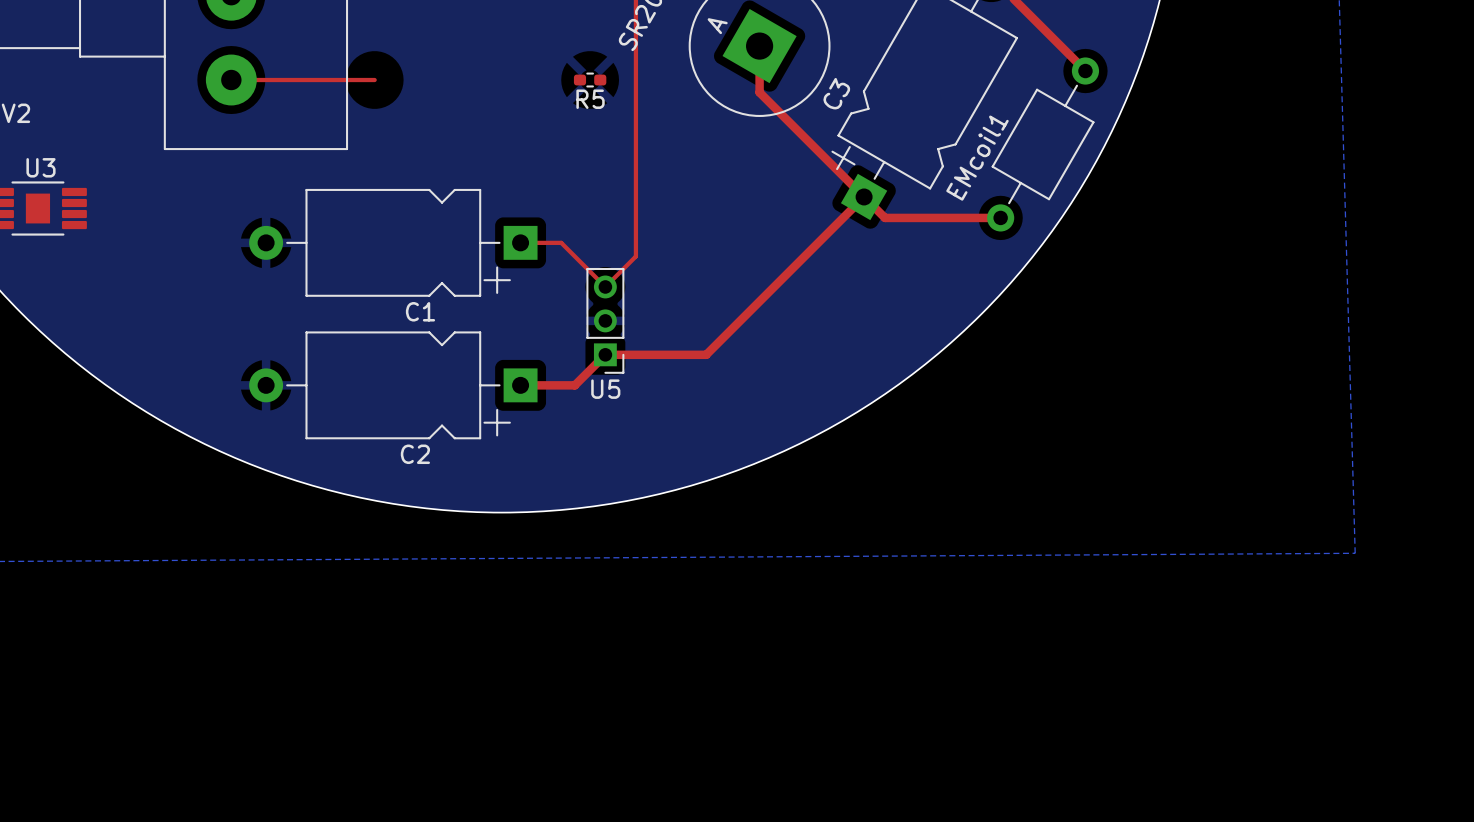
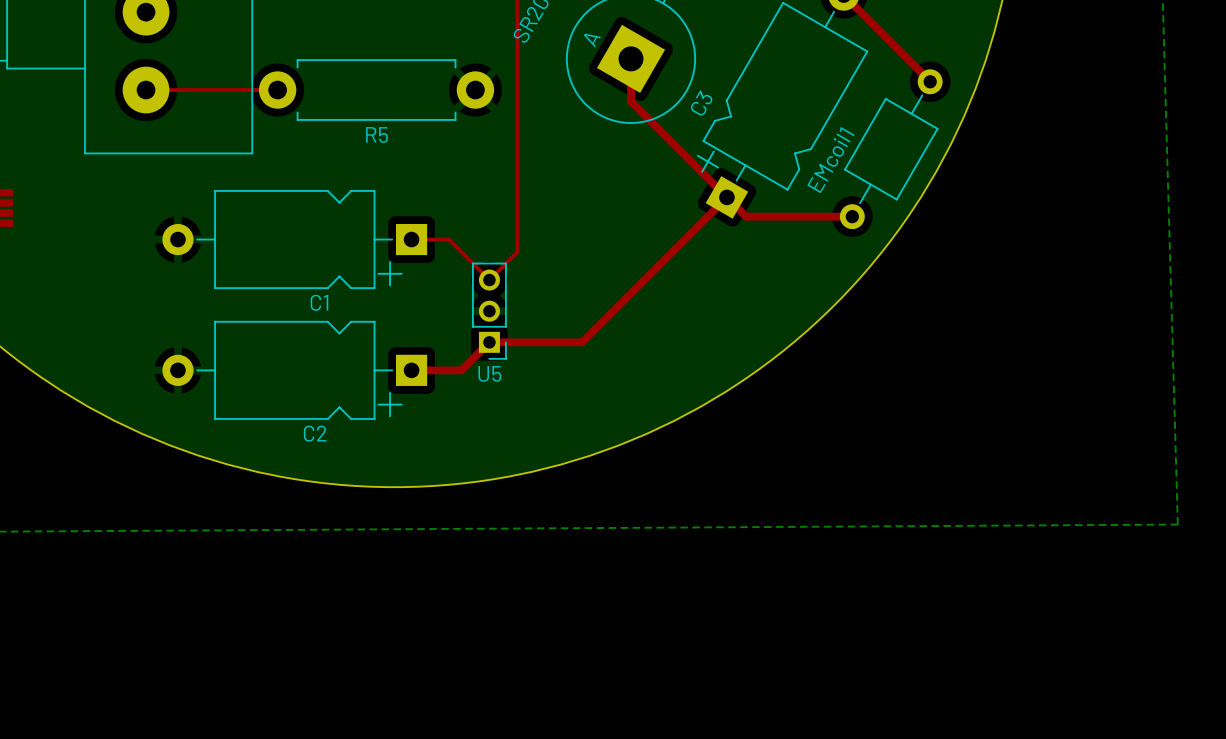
R5 footprint: [573, 72, 607, 88] -> [258, 59, 495, 121]

